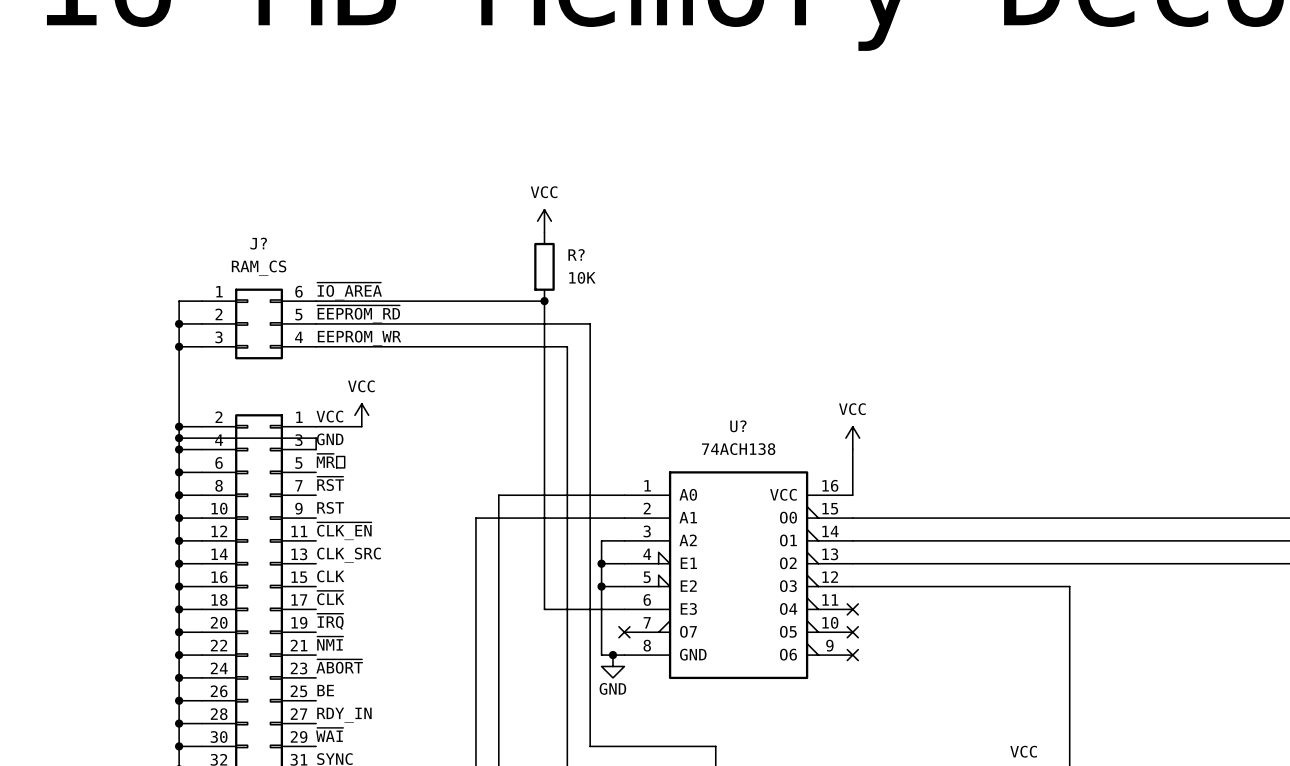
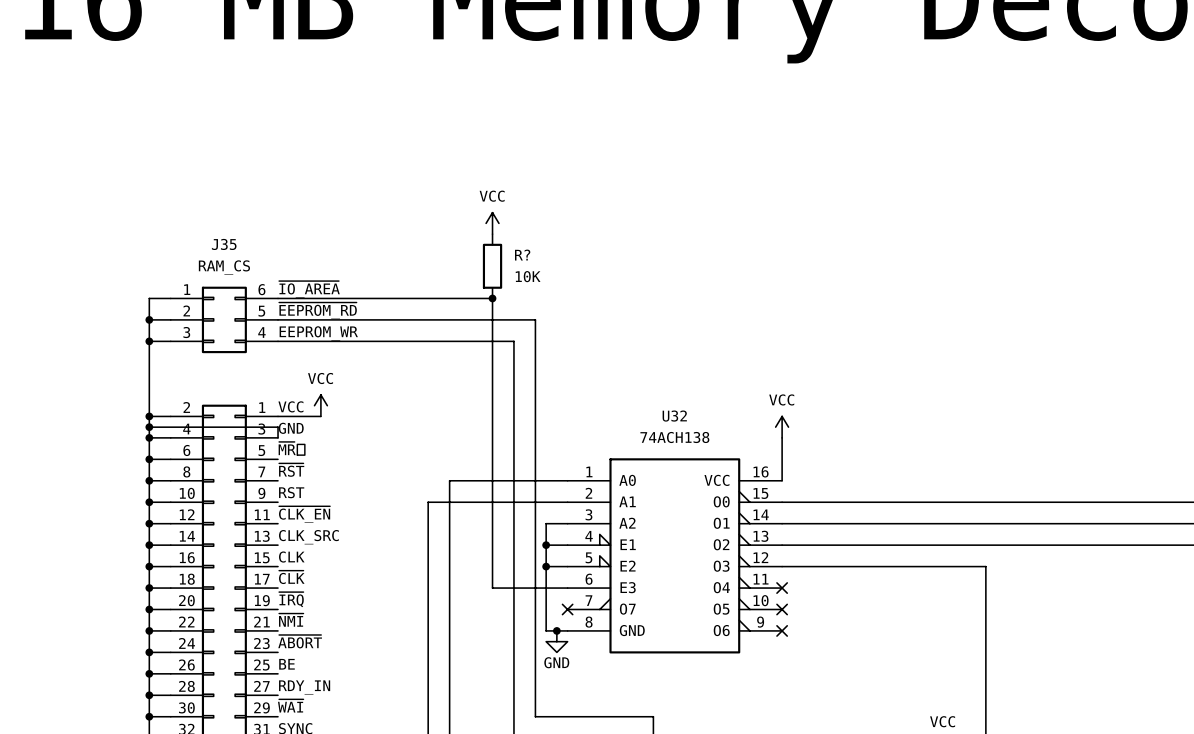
J? name: J? (258, 243) -> J35 (224, 244)
U? name: U? (738, 426) -> U32 (674, 416)

